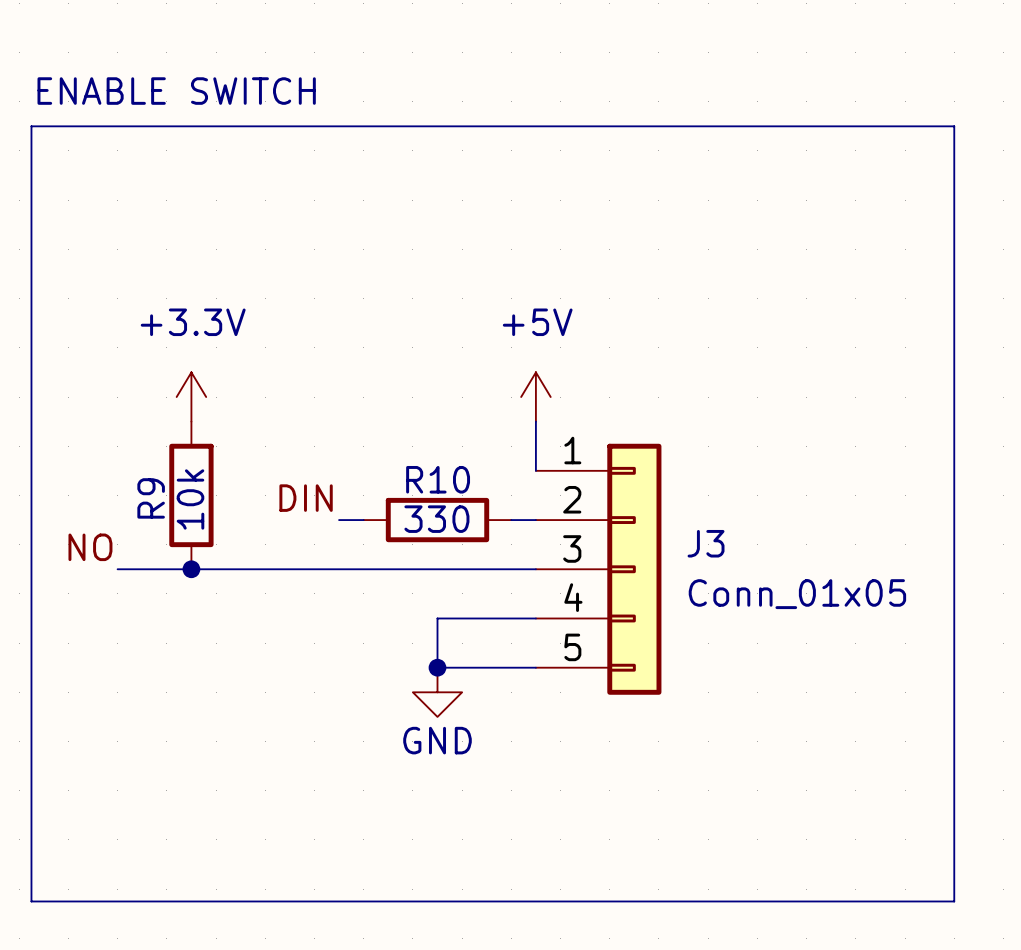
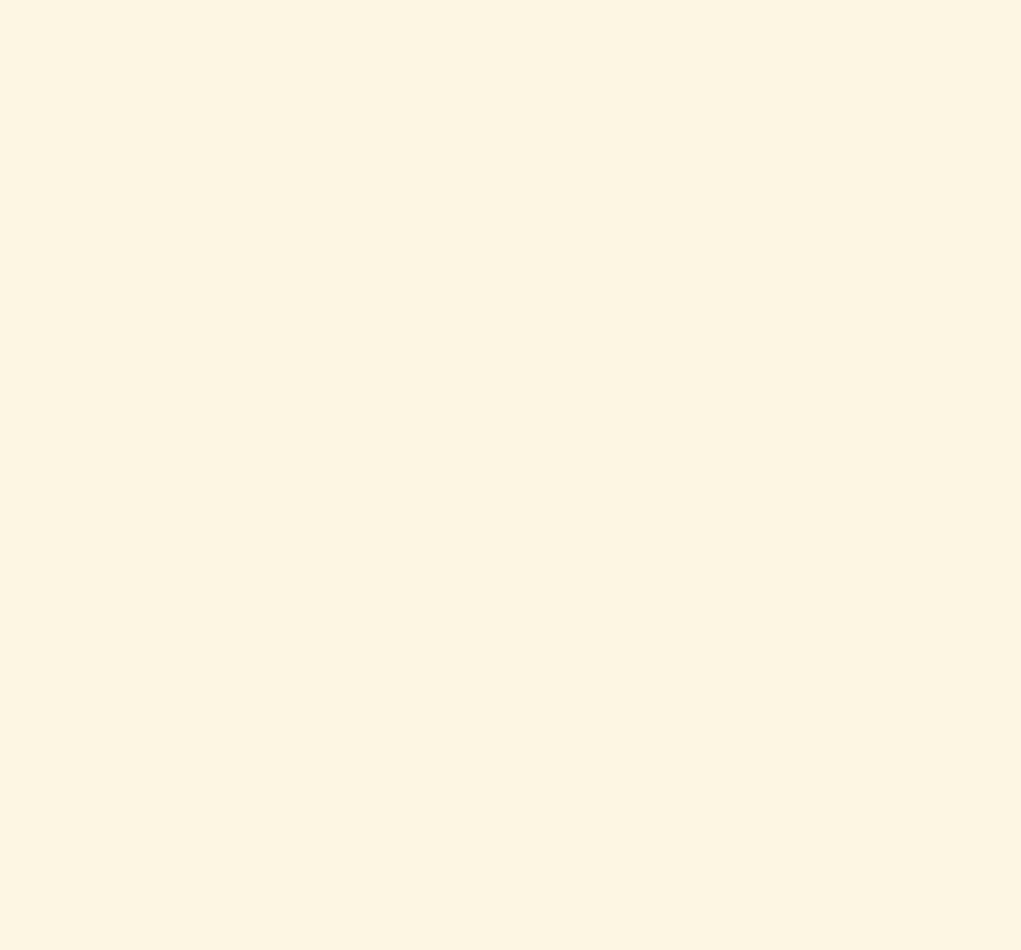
text: ENABLE SWITCH (176, 91) -> none
line: (31, 126) (954, 126) (954, 901) (31, 901) (31, 126) -> none
power symbol: +3.3V (191, 397) -> none
power symbol: +5V (535, 397) -> none
wire: (535, 421) (535, 470) -> none
R9: 10k (191, 495) -> none
label: DIN (306, 498) -> none
wire: (339, 520) (363, 520) -> none
R10: 330 (437, 520) -> none
wire: (511, 520) (535, 520) -> none
label: NO (90, 547) -> none
wire: (117, 569) (535, 569) -> none
junction: (191, 569) -> none
J3: Conn_01x05 (598, 569) -> none
wire: (535, 618) (437, 618) (437, 667) (535, 667) -> none
junction: (437, 667) -> none
power symbol: GND (437, 692) -> none

